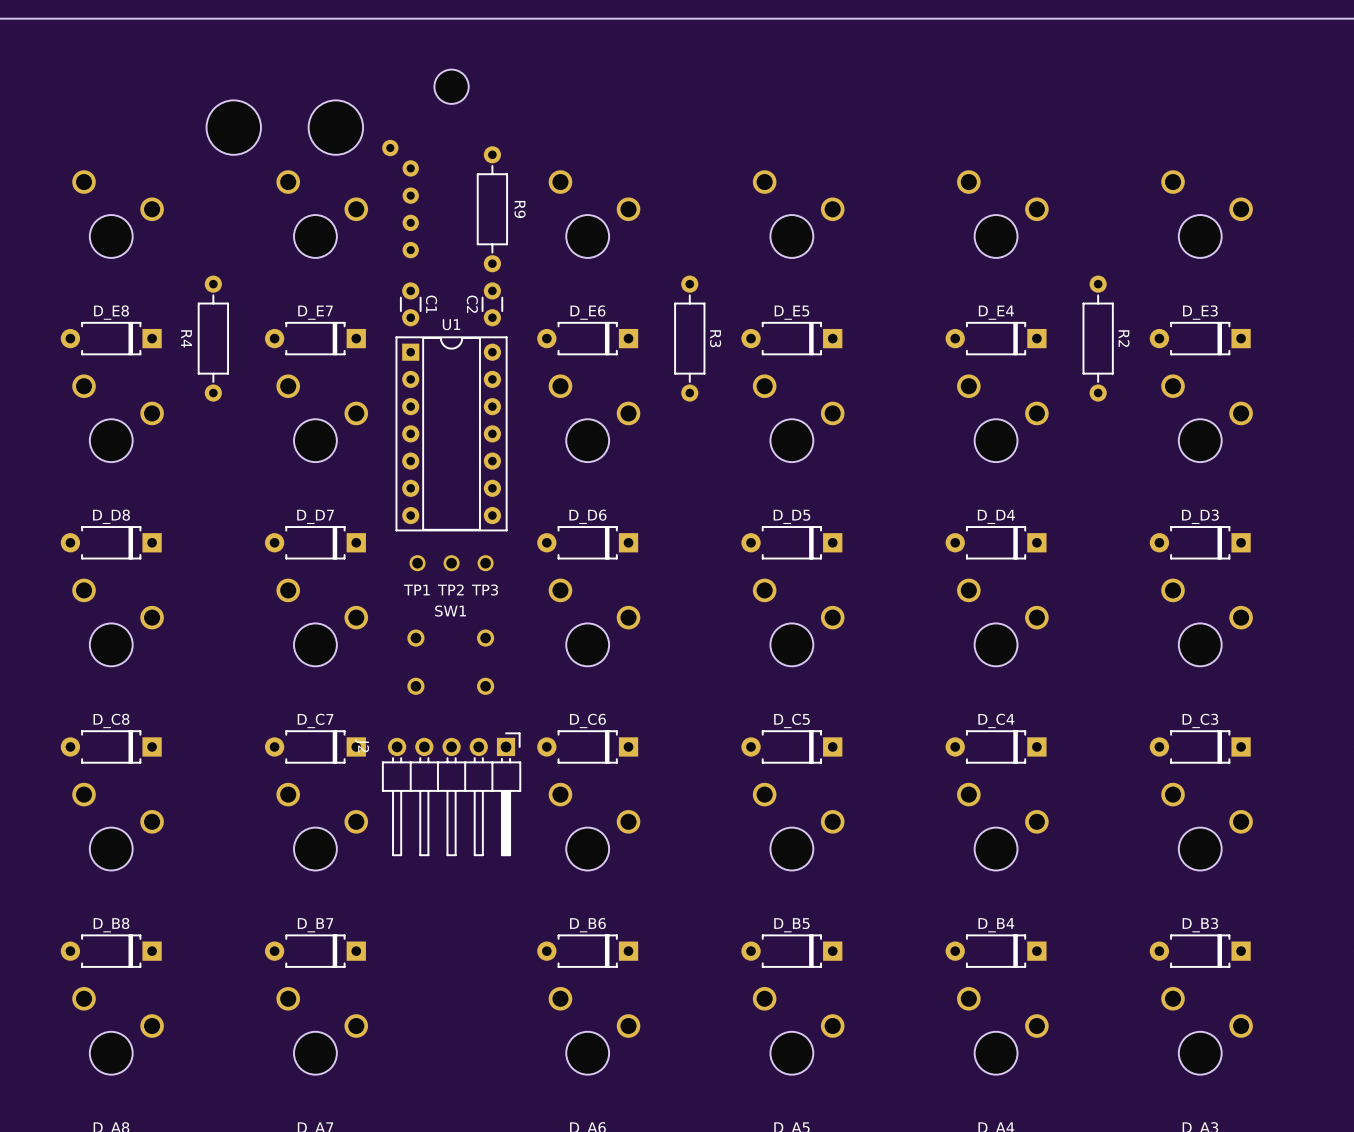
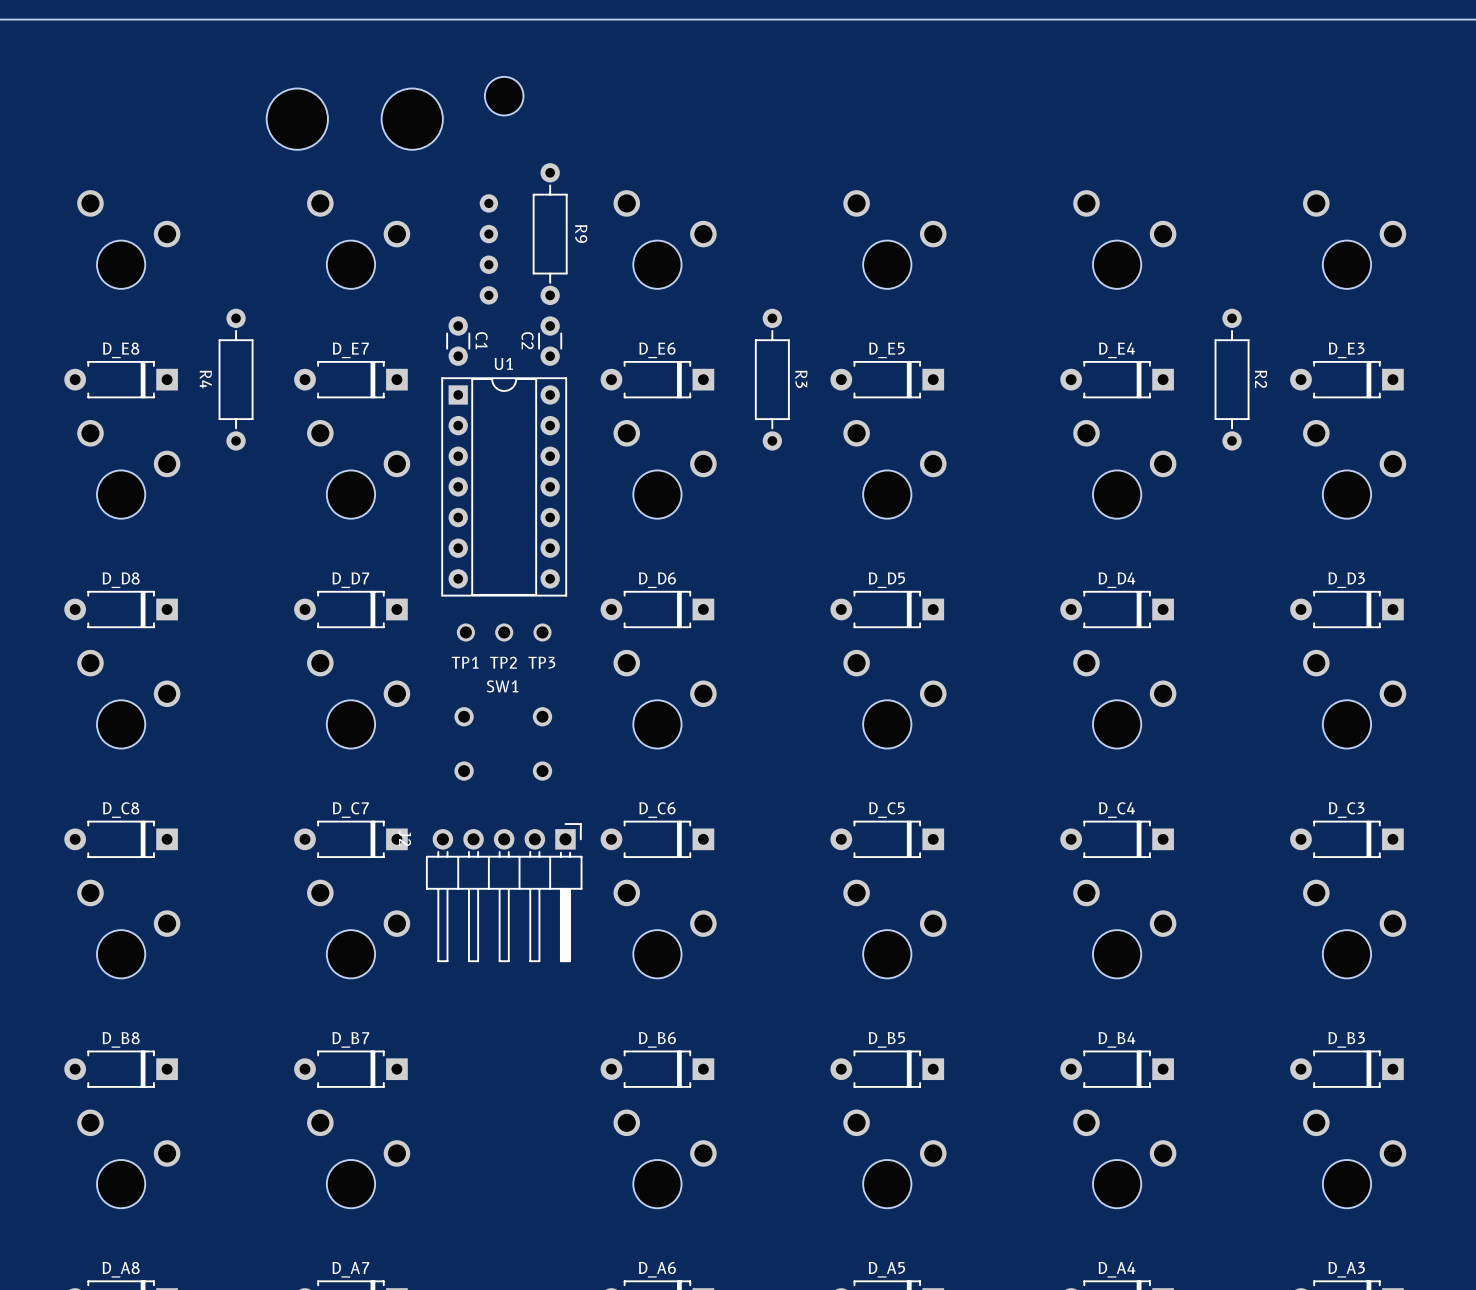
part: none -> (297, 119)
part: none -> (412, 119)
part: (233, 127) -> none
part: (335, 127) -> none
part: (400, 199) -> none
part: none -> (488, 249)

